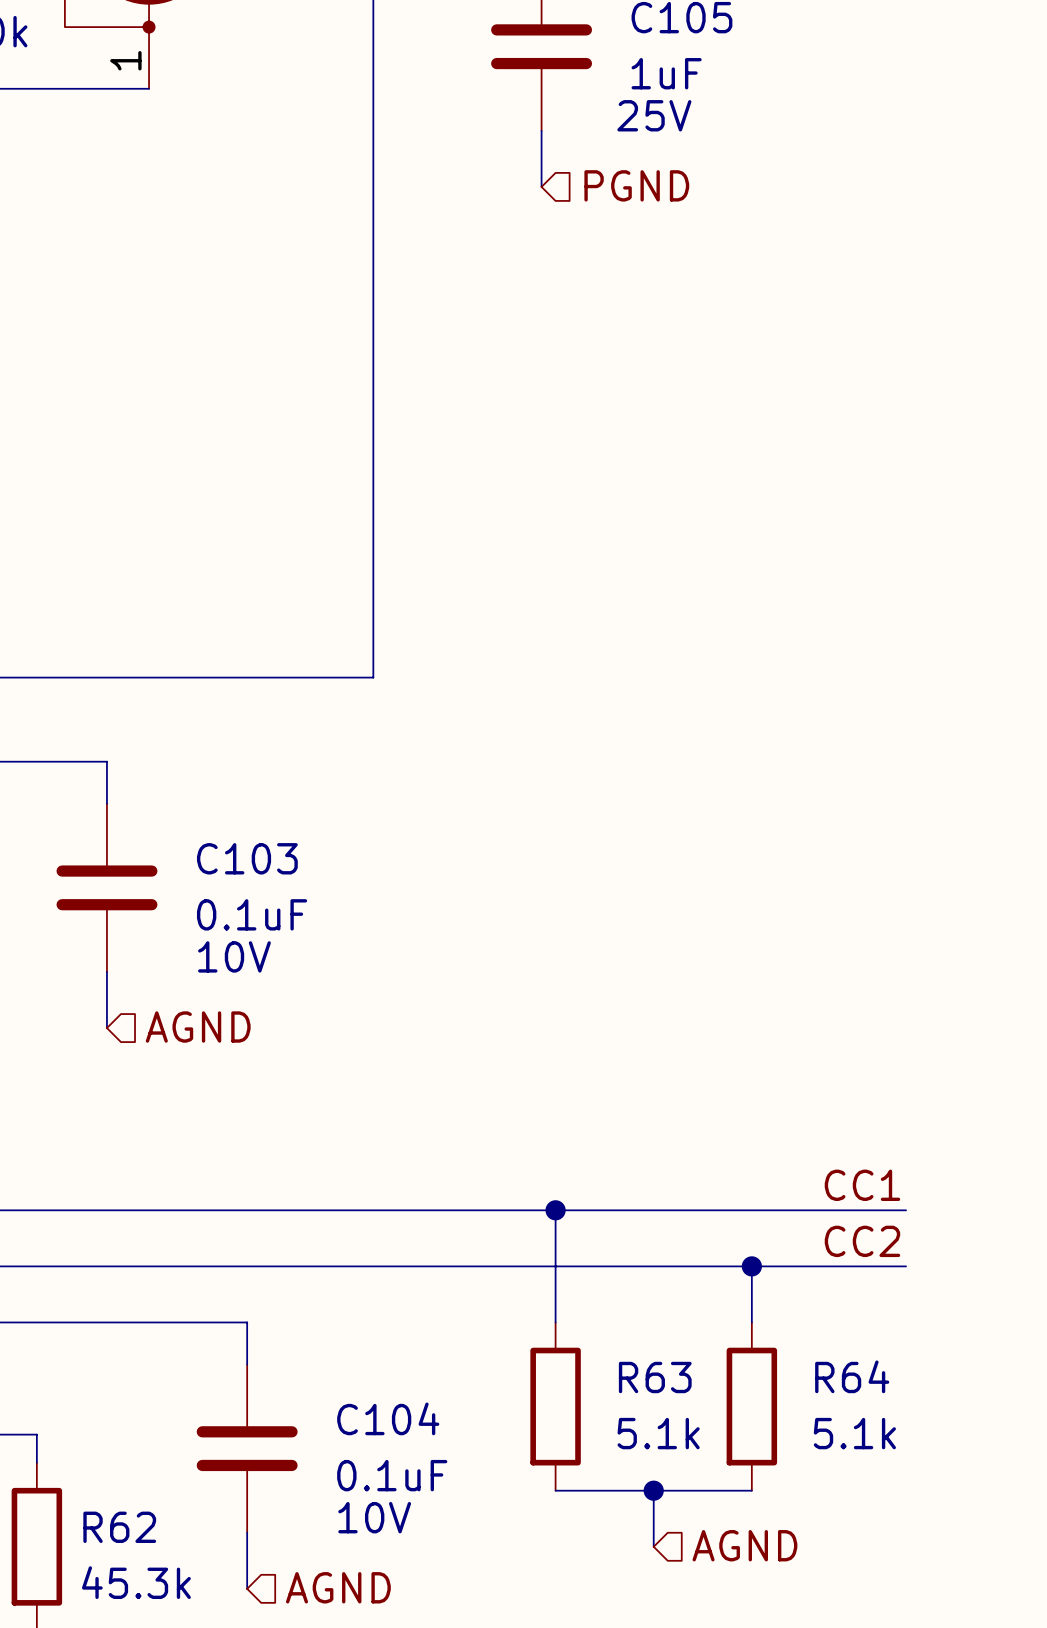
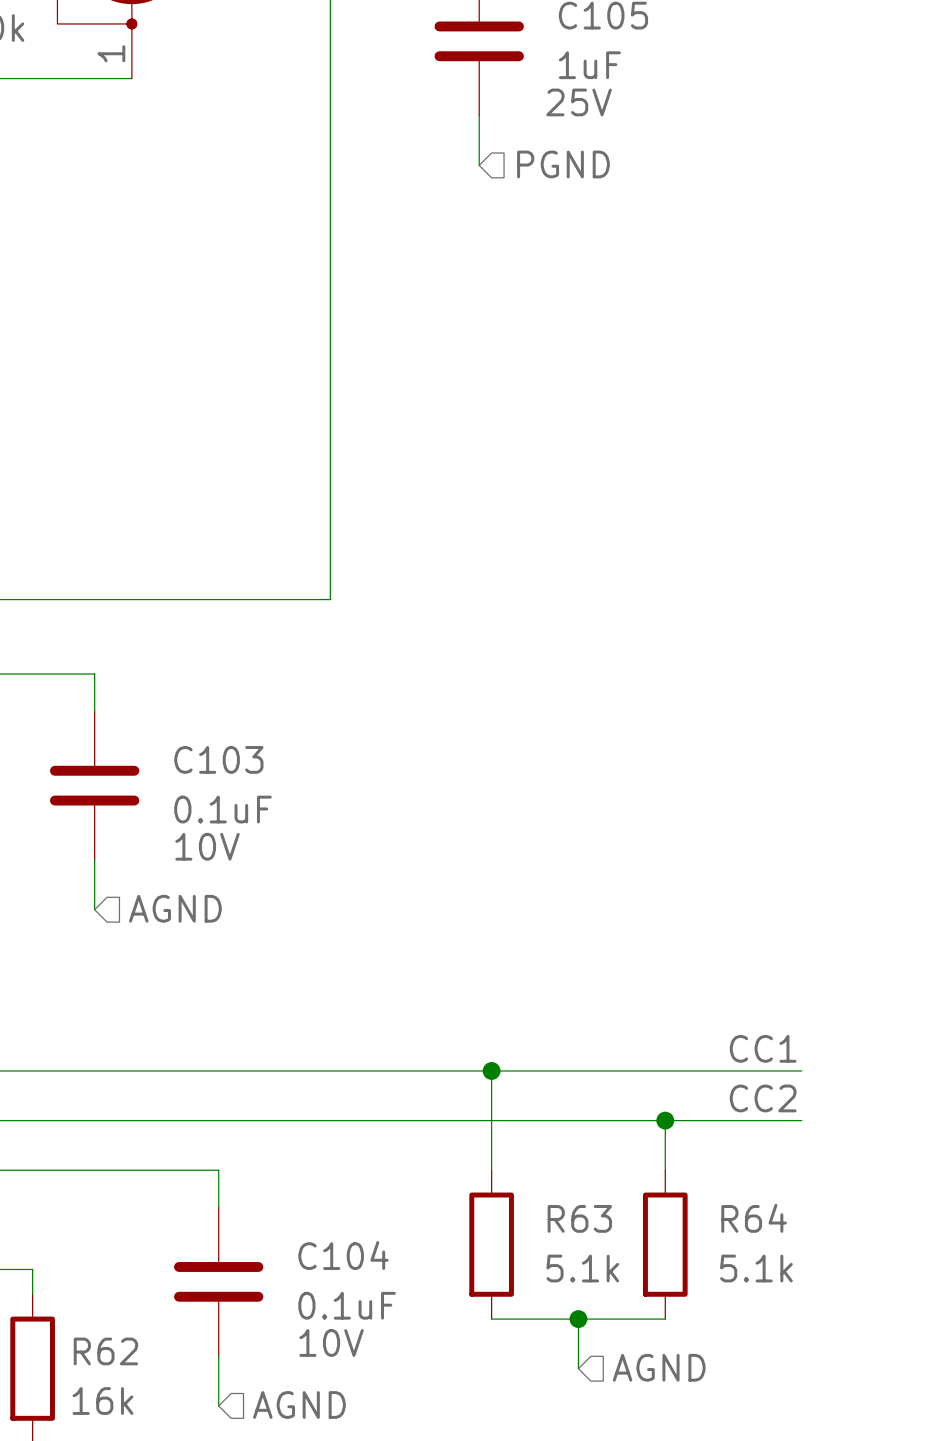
R62 value: 45.3k (136, 1582) -> 16k (102, 1401)

